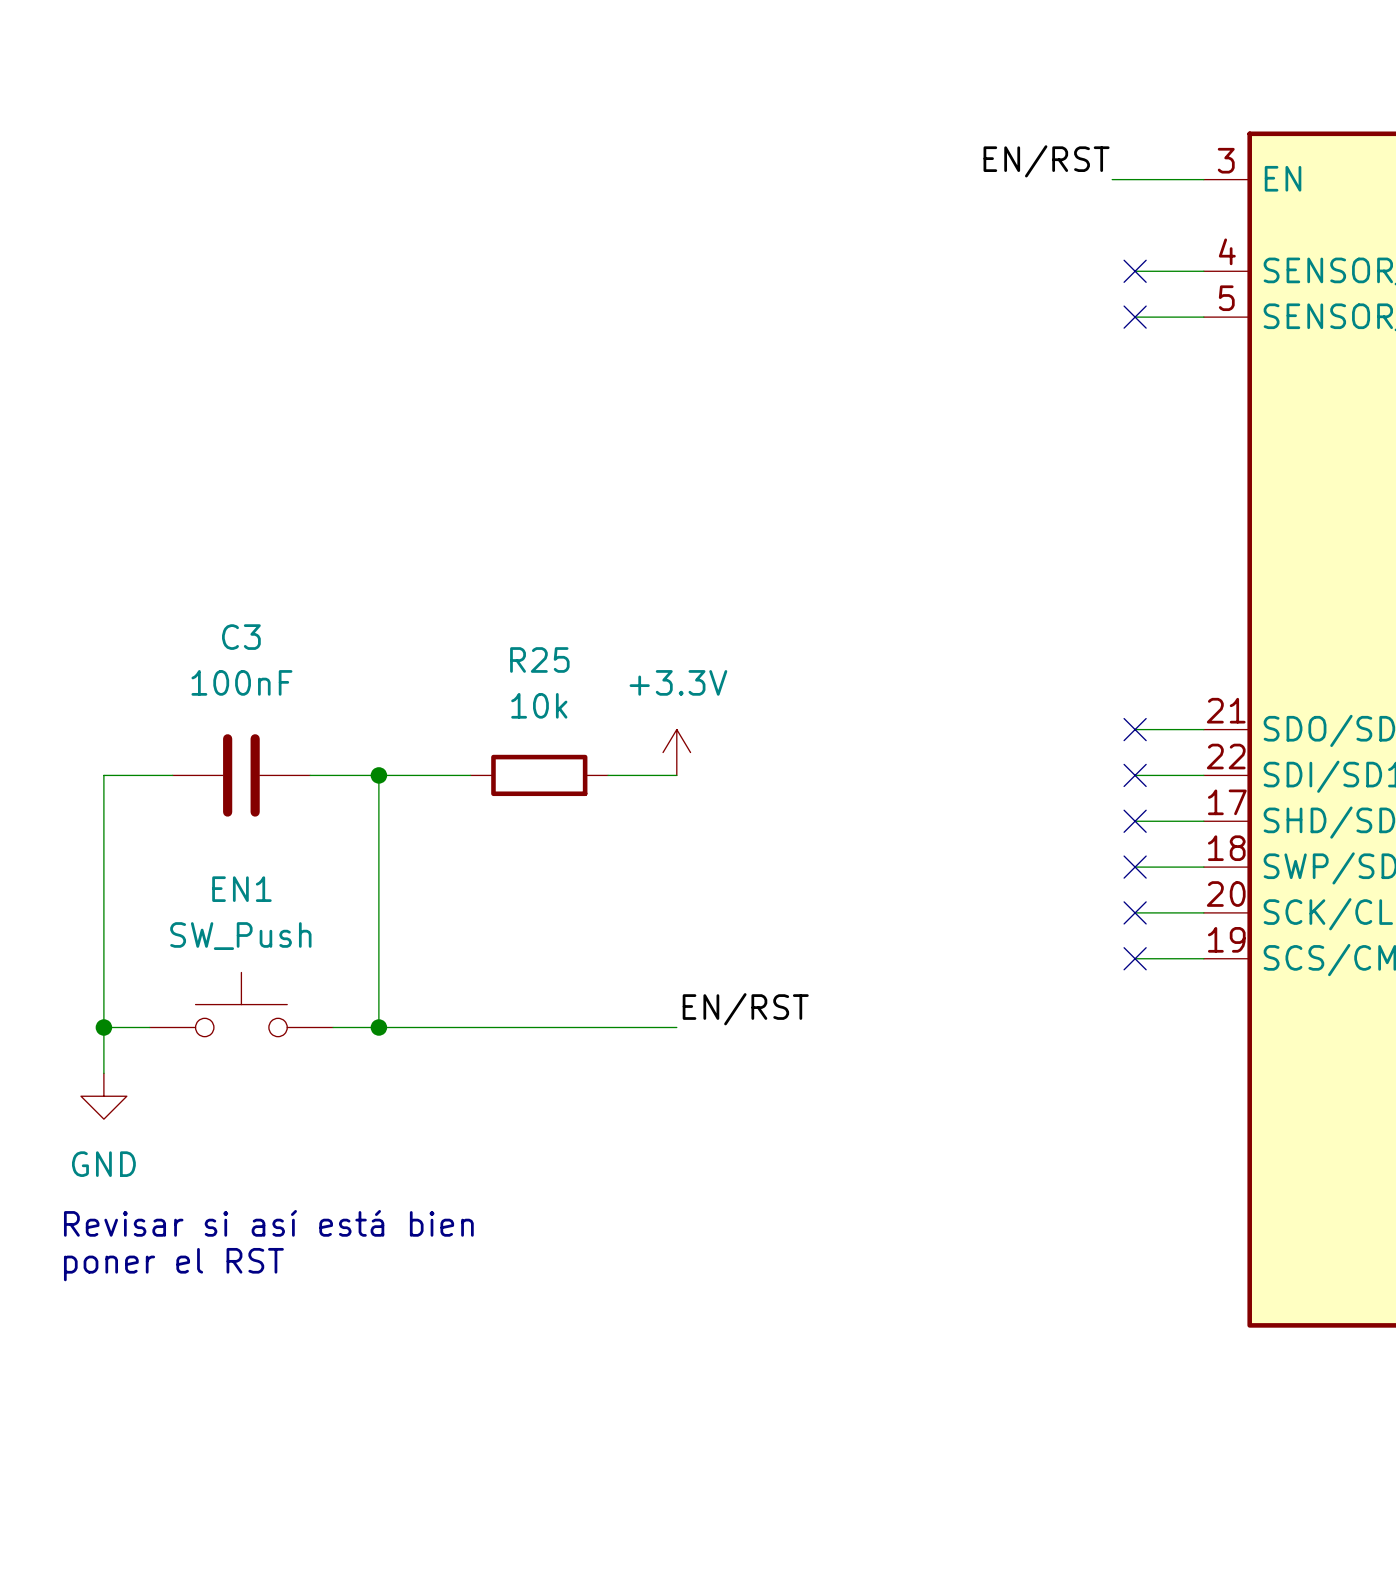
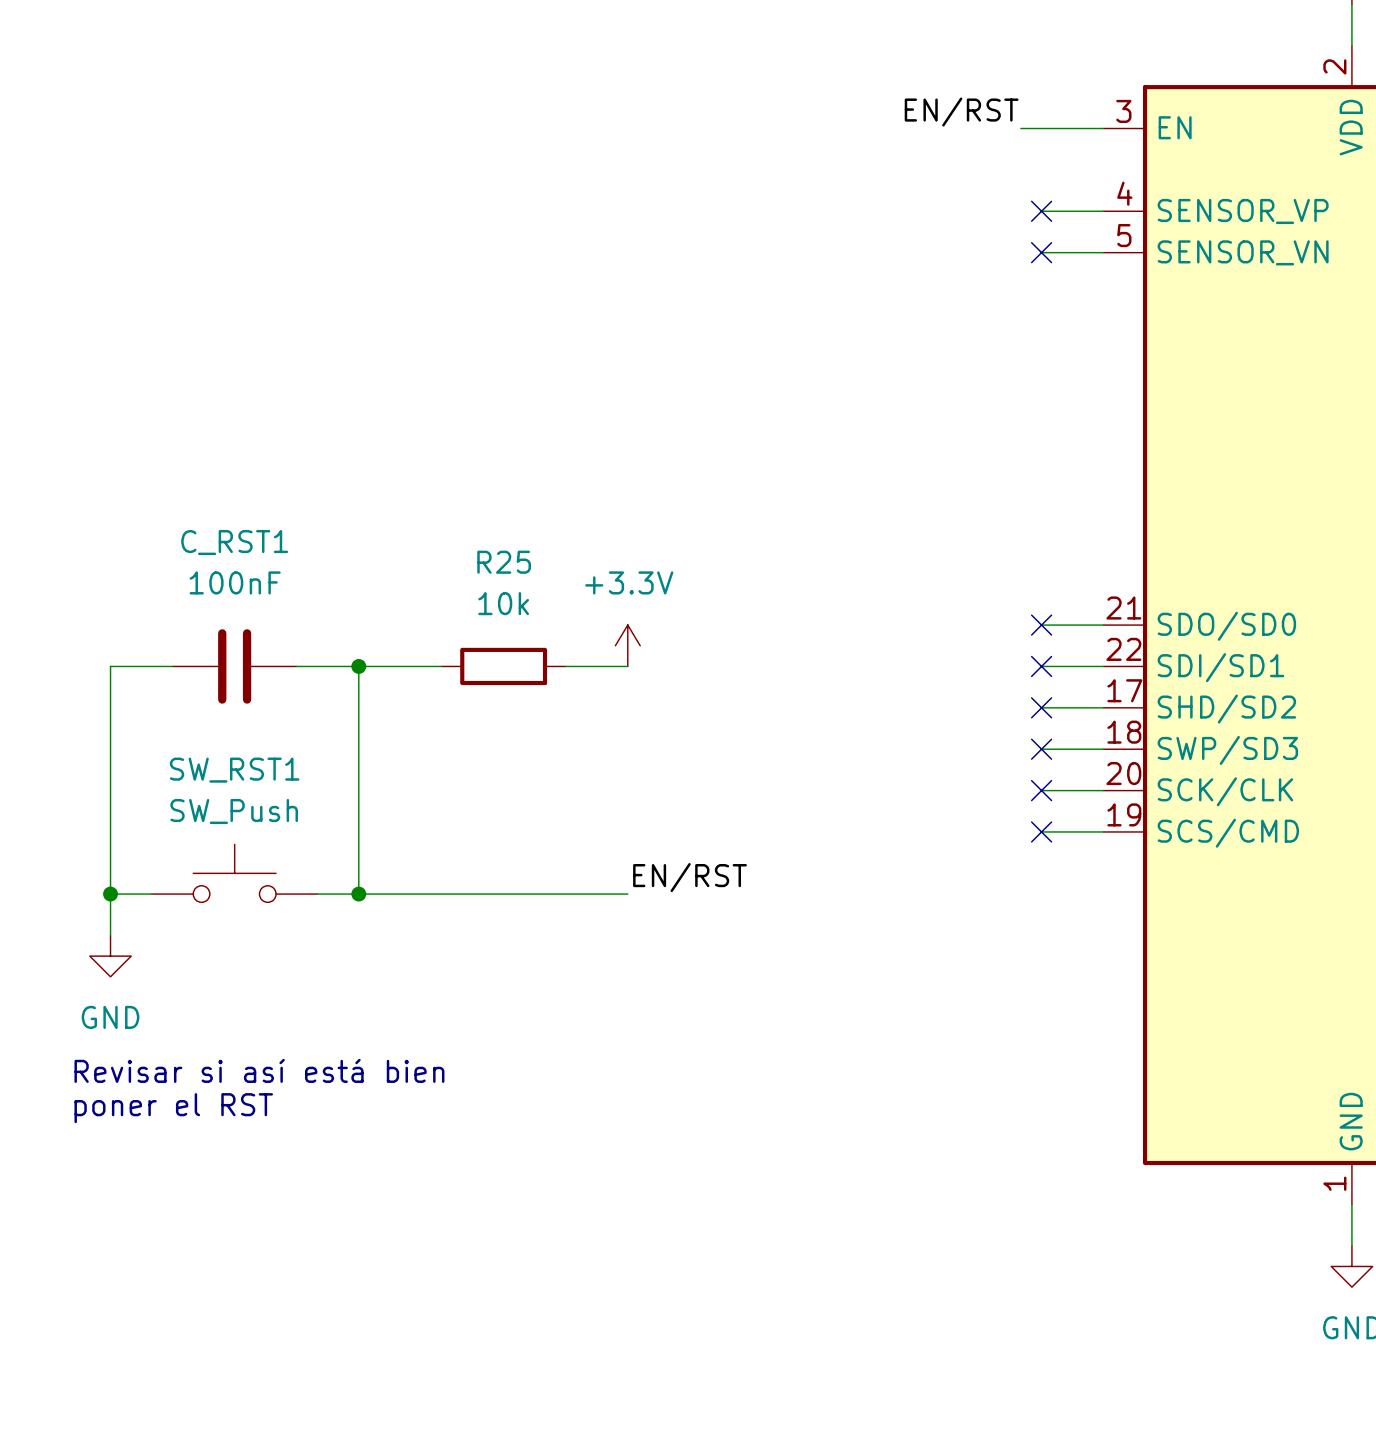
C3 name: C3 (241, 637) -> C_RST1 (234, 542)
EN1 name: EN1 (241, 889) -> SW_RST1 (234, 770)

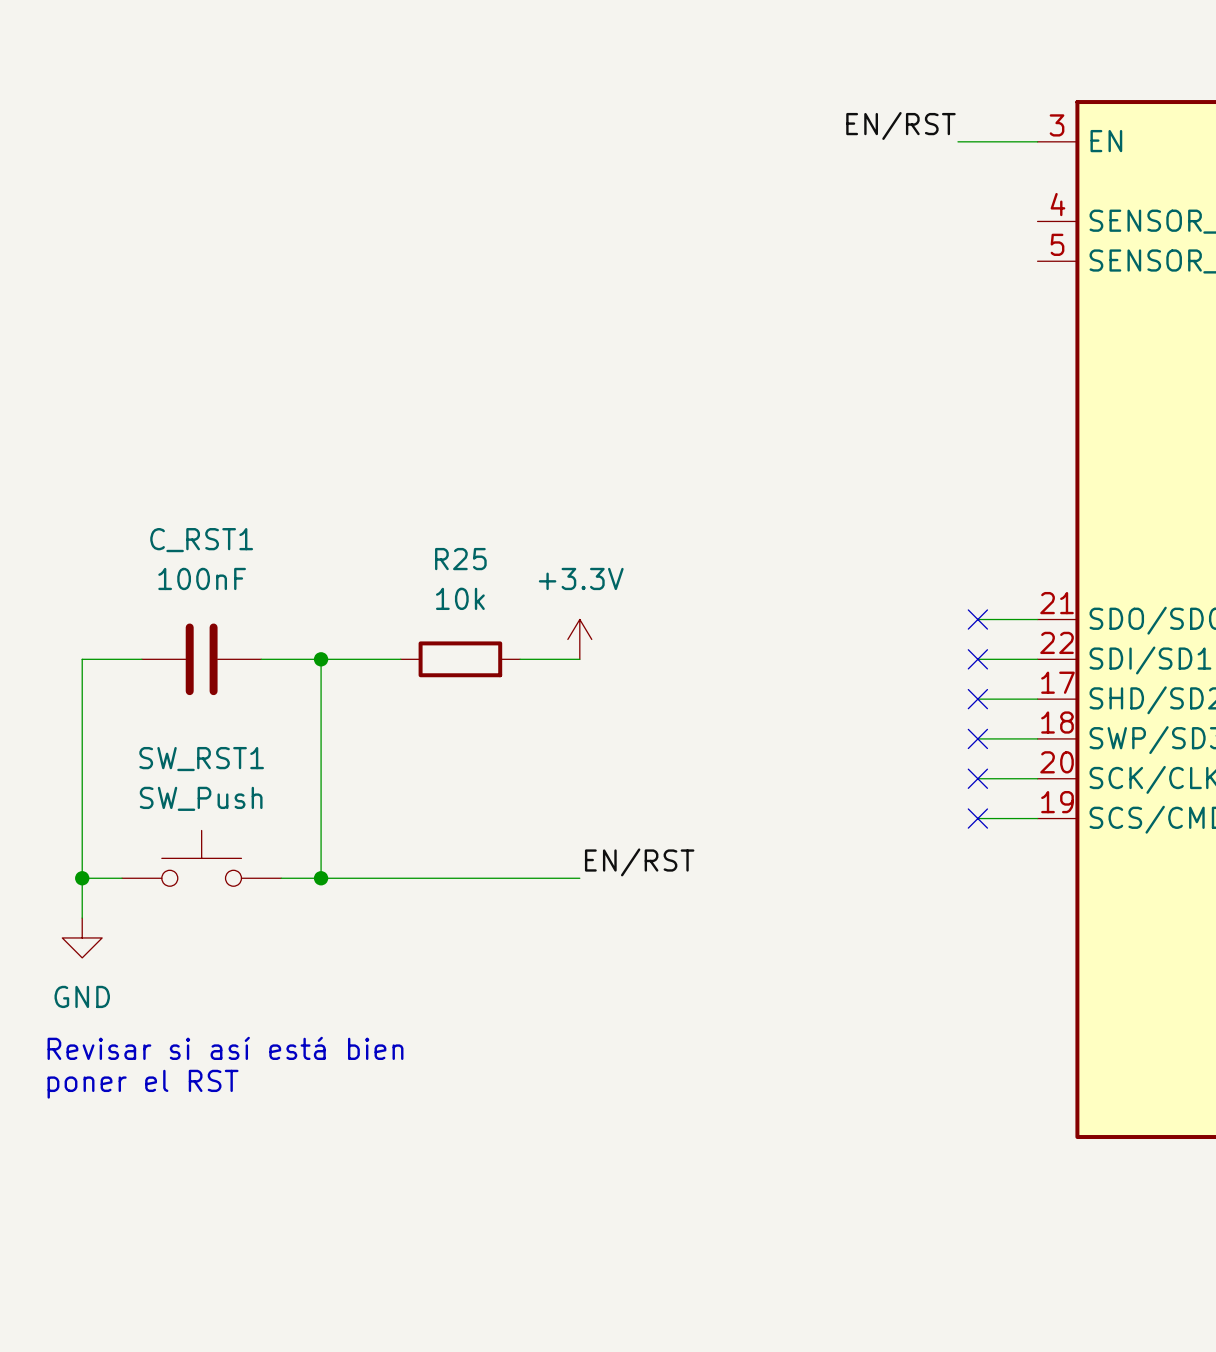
wire: (1041, 211) (1103, 211) -> none
no-connect mark: (1041, 211) -> none
wire: (1041, 252) (1103, 252) -> none
no-connect mark: (1041, 252) -> none

